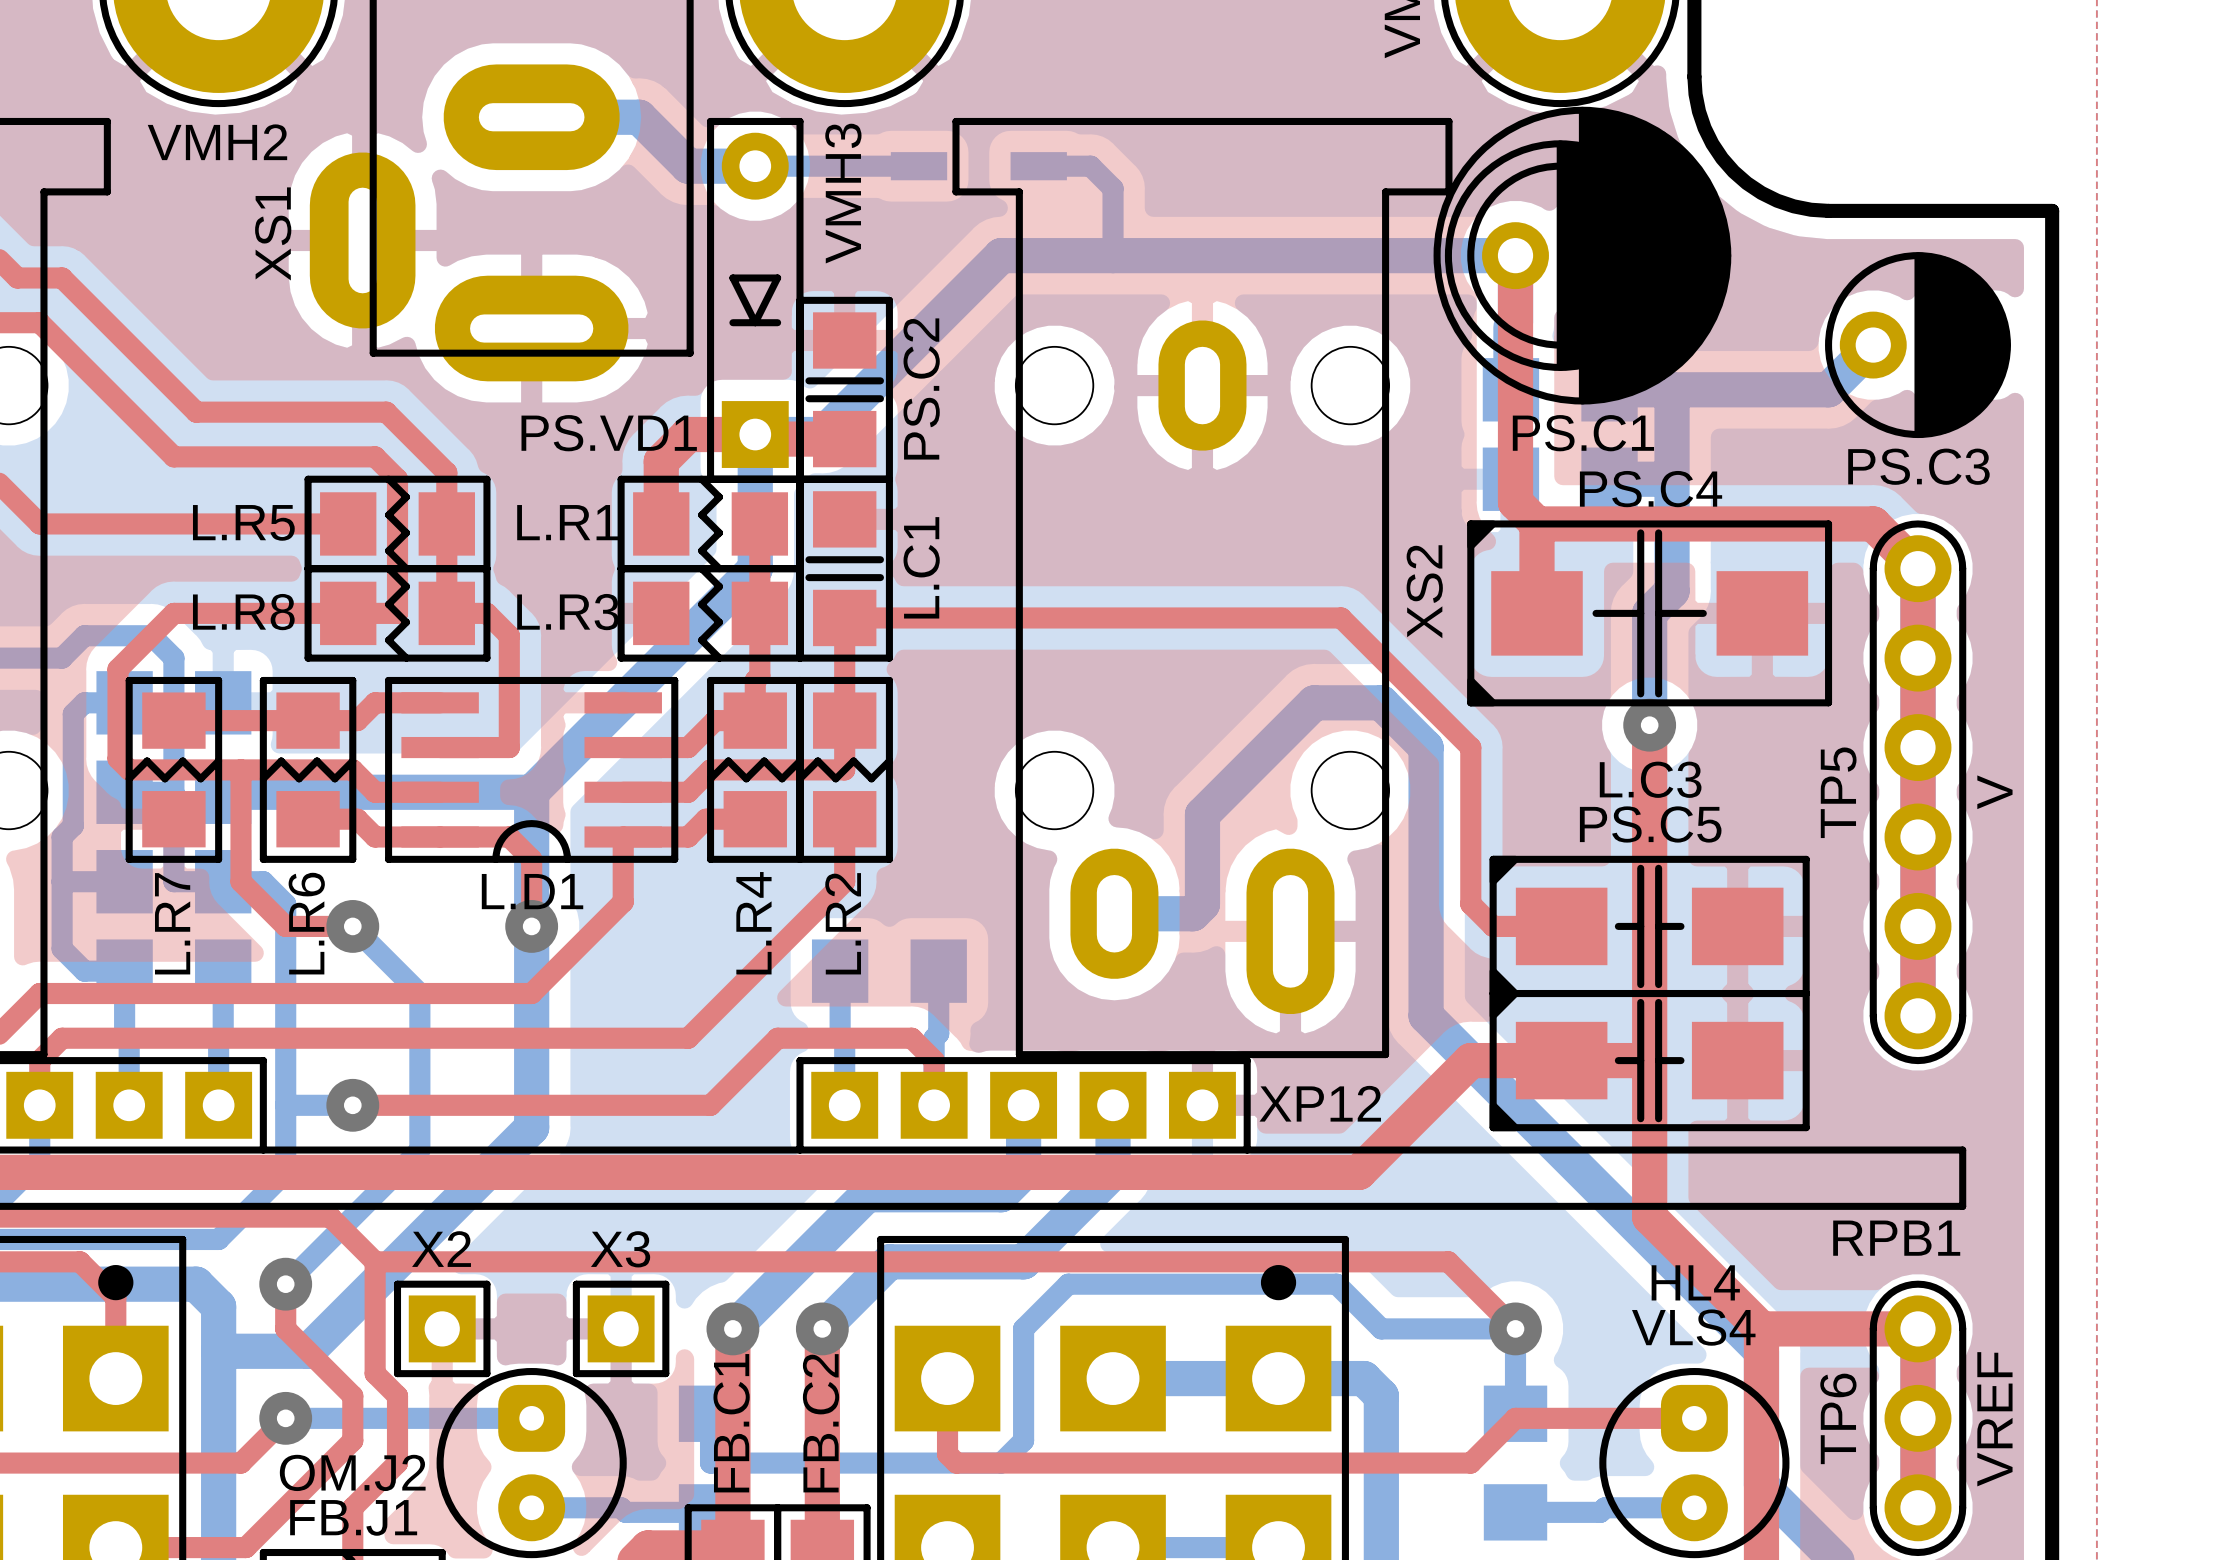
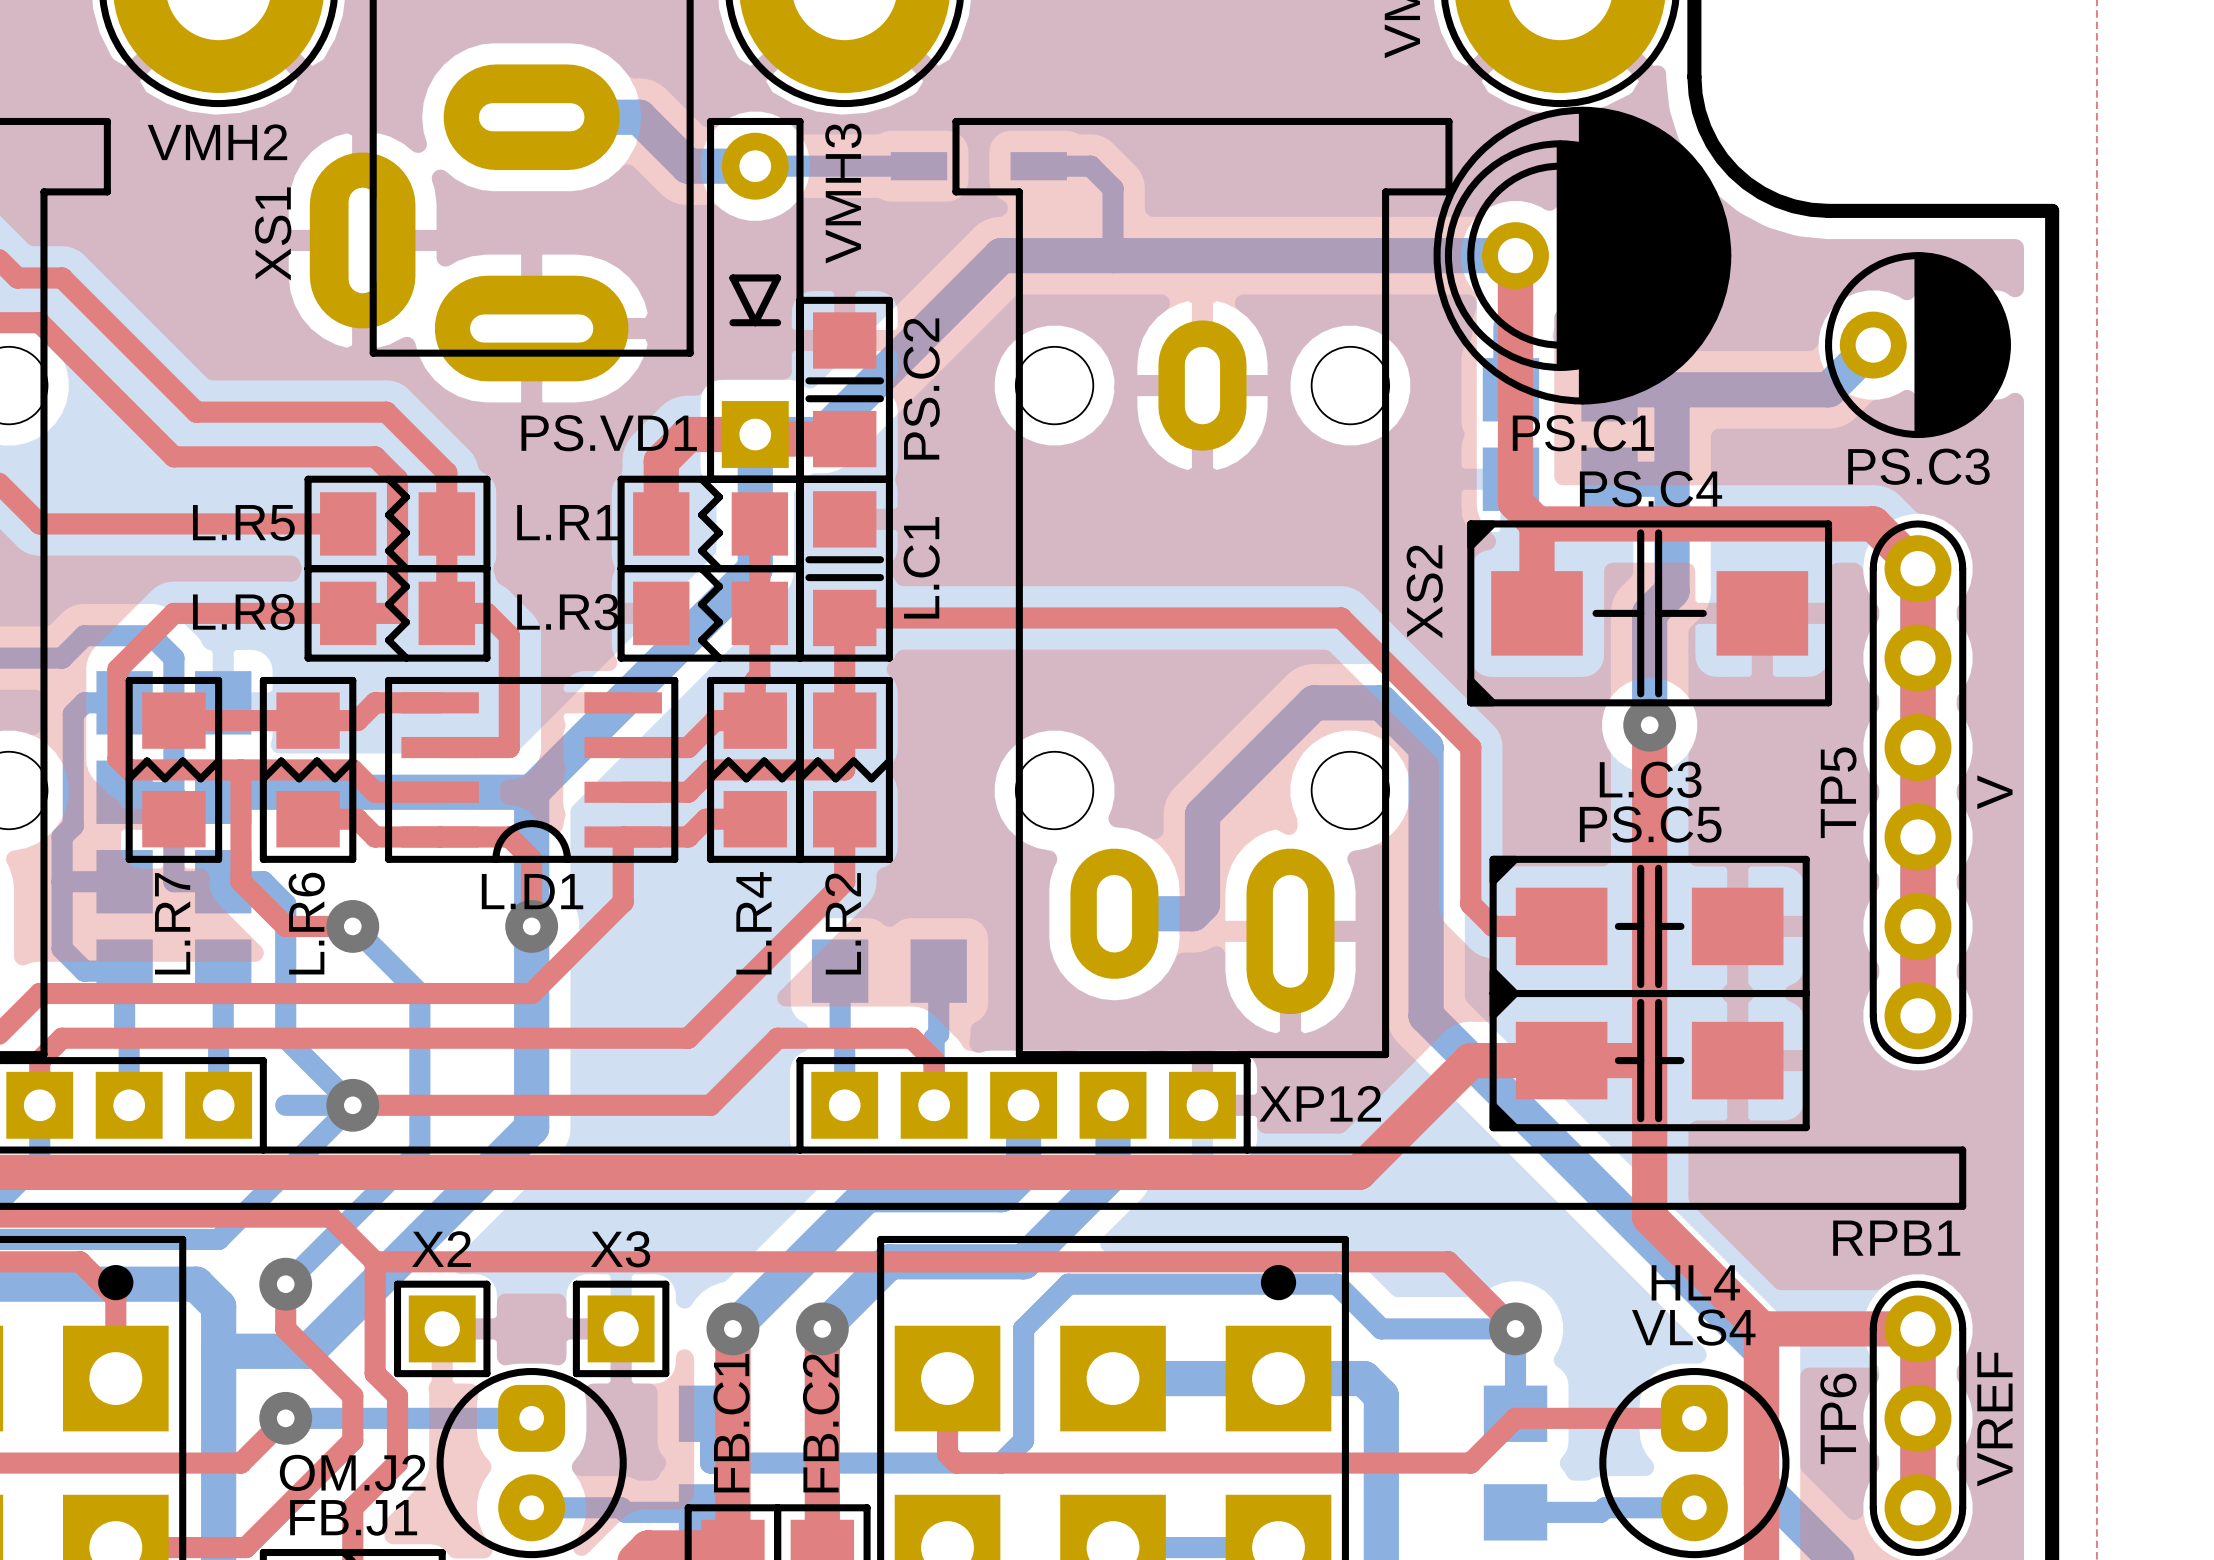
bottom track: (285, 1038) (285, 1172) -> (285, 1038) (352, 1105) (285, 1172)

